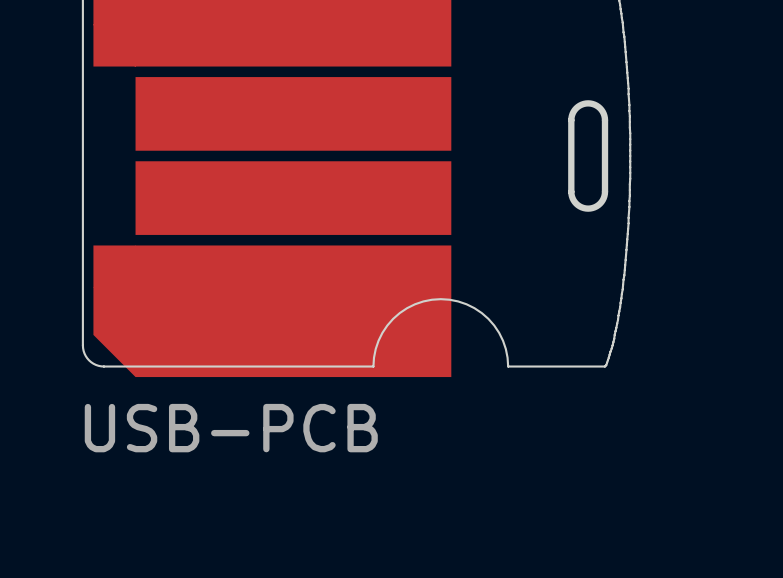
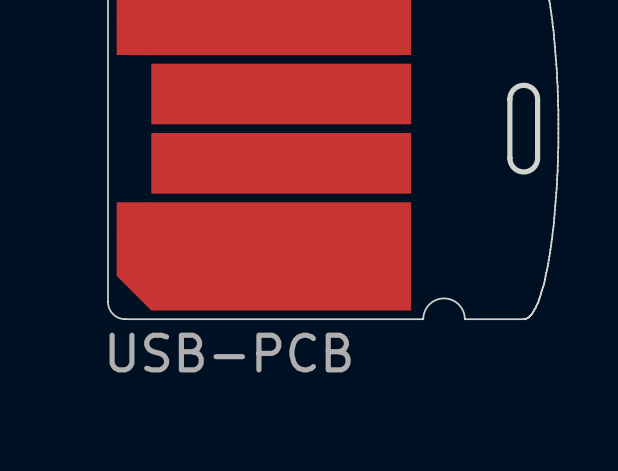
board edge: (82, 345) (87, 358) (93, 363) (101, 366) (373, 366) (378, 340) (393, 318) (415, 304) (440, 299) (466, 304) (488, 318) (503, 340) (508, 366) (606, 365) -> (107, 284) (109, 308) (114, 315) (123, 319) (423, 319) (424, 311) (429, 304) (436, 299) (444, 298) (452, 299) (458, 304) (463, 311) (464, 319) (525, 318)
board edge: none -> (538, 300) (533, 312) (526, 318)

